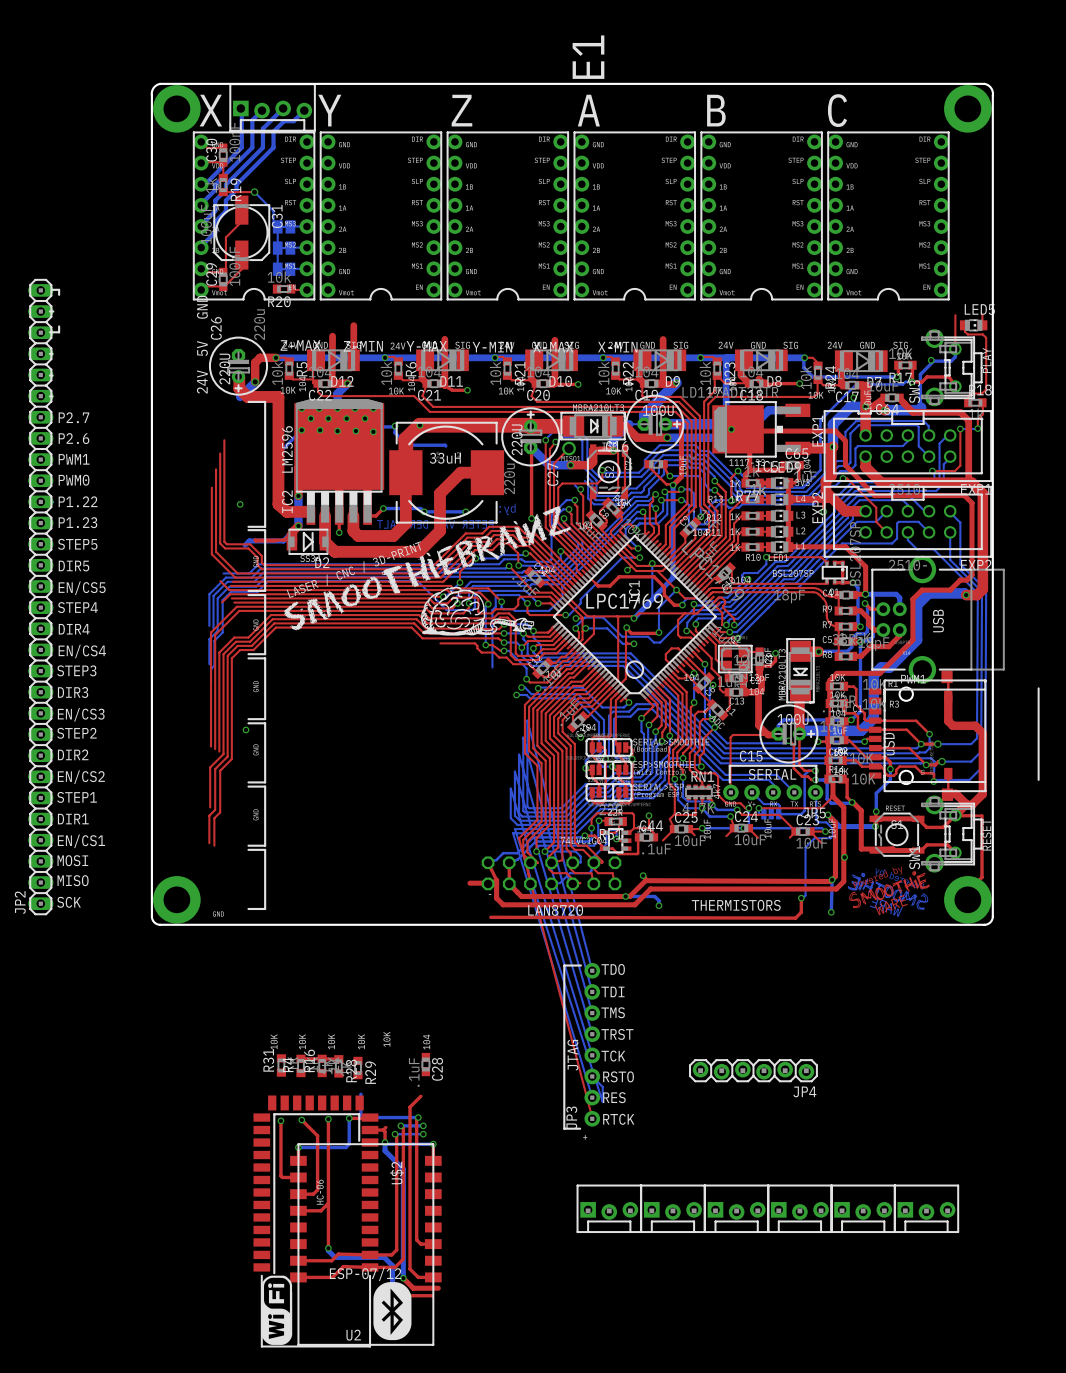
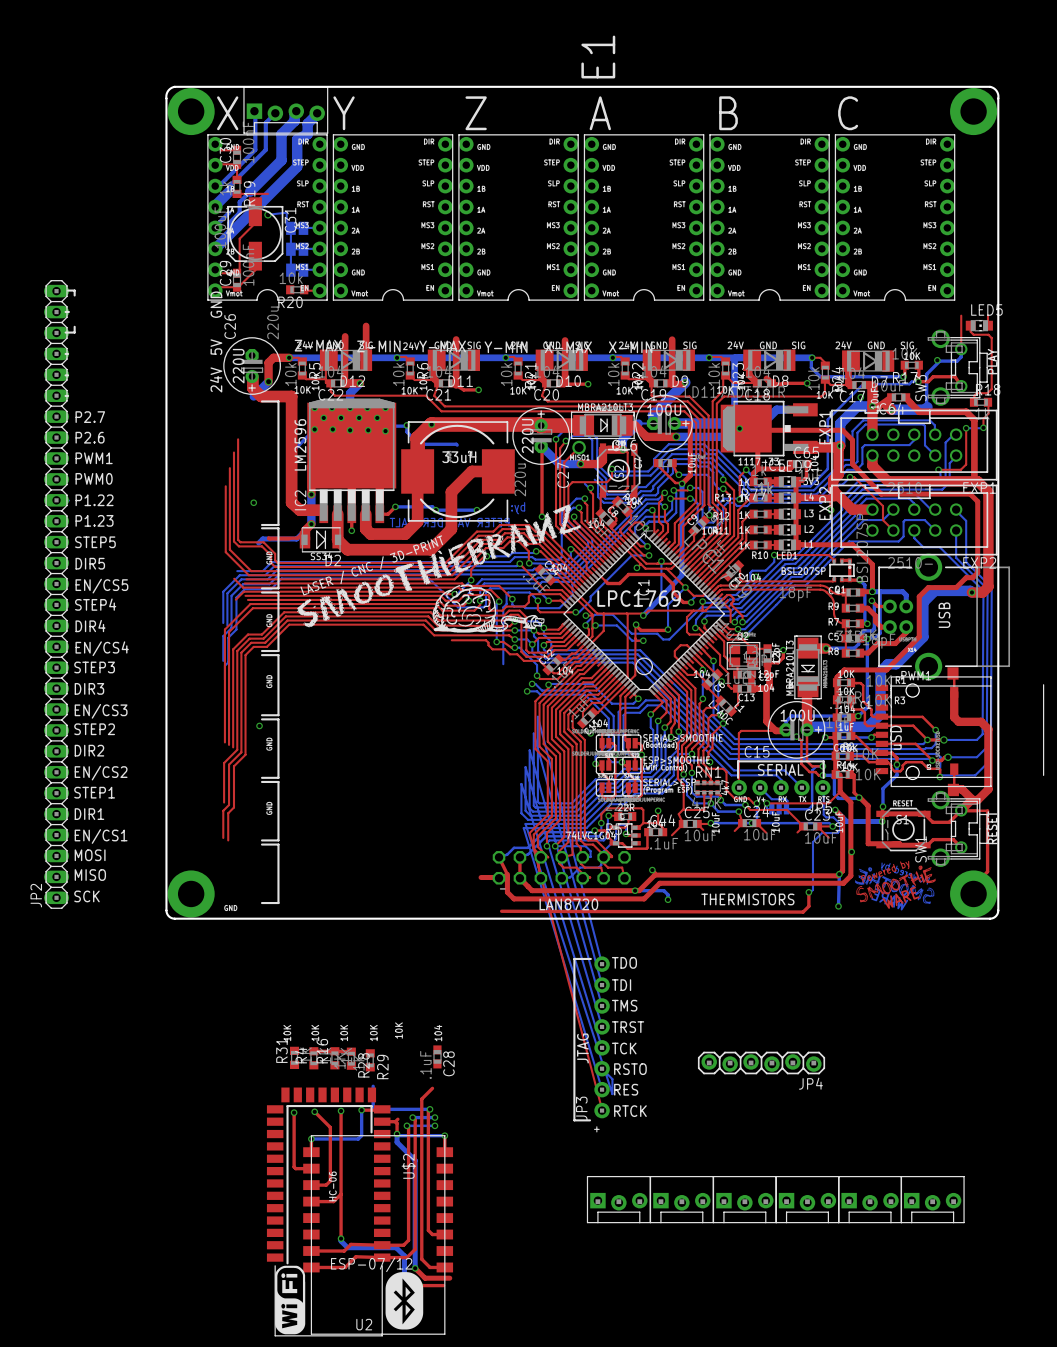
bottom track: (281, 110) (262, 128) (262, 147) (225, 184) (225, 189) (215, 200) (215, 211) -> none
bottom track: (304, 110) (293, 121) (284, 121) (273, 131) (273, 147) (236, 184) (236, 189) -> (294, 112) (294, 121) (281, 134) (281, 160) (250, 191)
bottom track: none -> (317, 113) (307, 123) (307, 134) (297, 139) (297, 166) (215, 248)
bottom track width: thin (215, 189) (201, 204) -> thick (229, 191) (215, 205)
bottom track: (254, 192) (273, 211) -> (267, 214) (286, 212)
via position: (254, 192) -> (267, 214)

